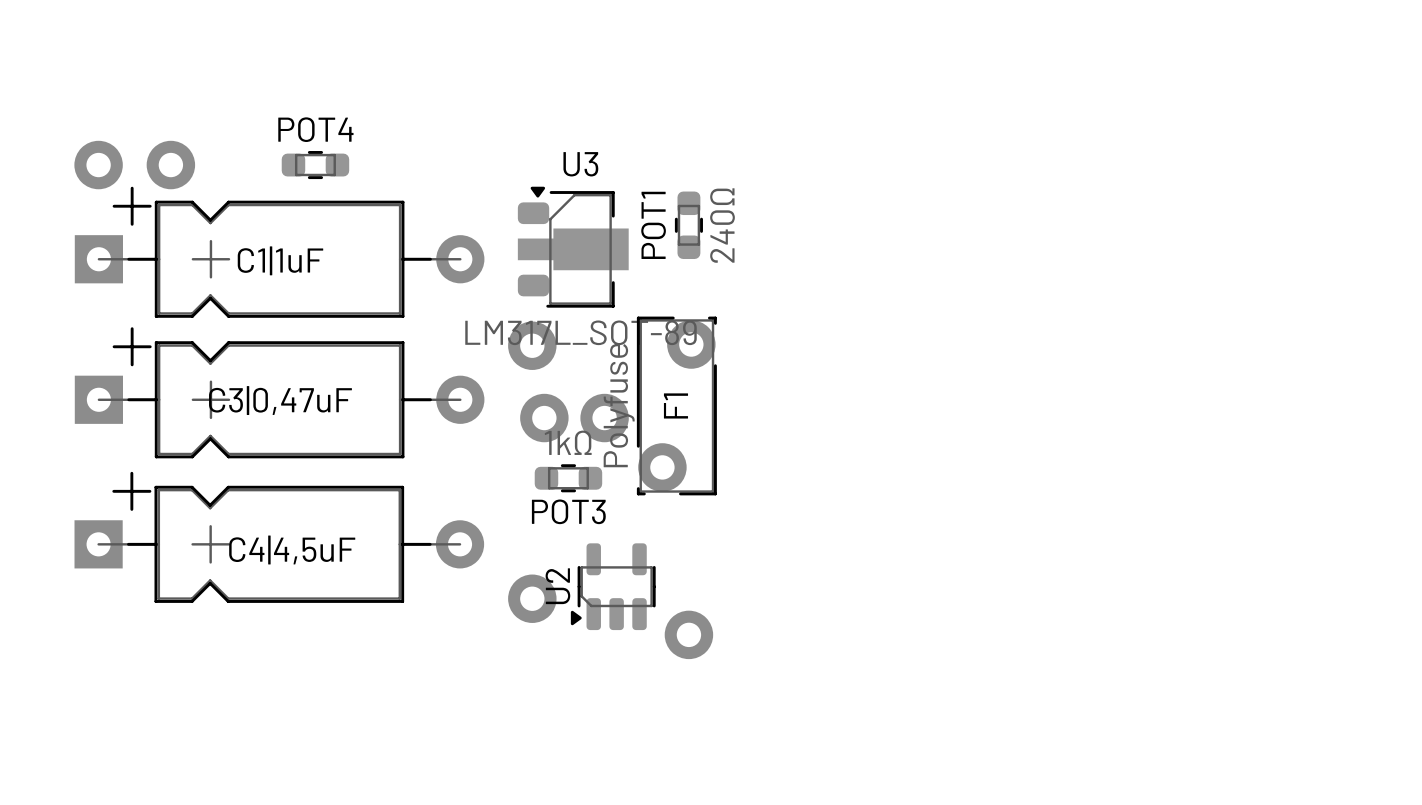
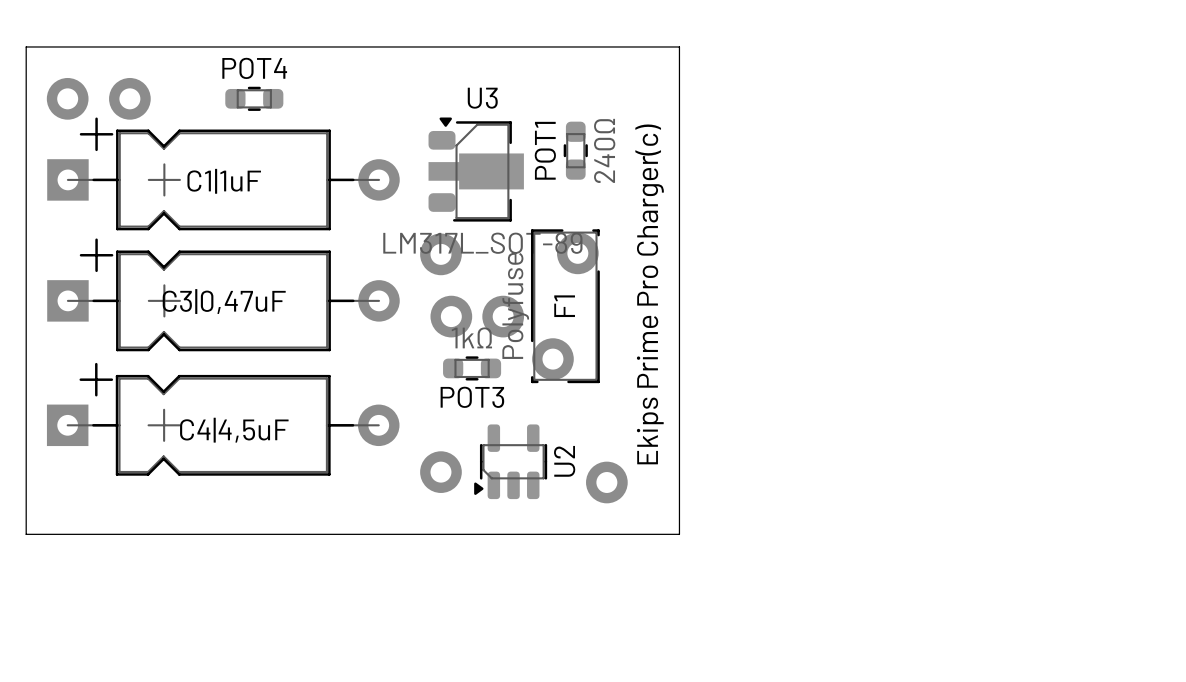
board edge: none -> (26, 46) (679, 46) (679, 534) (26, 534) (26, 46)
text: none -> Ekips Prime Pro Charger(c) (649, 294)
U2 name position: U2 (557, 586) -> U2 (564, 461)
part position: (688, 634) -> (606, 482)

